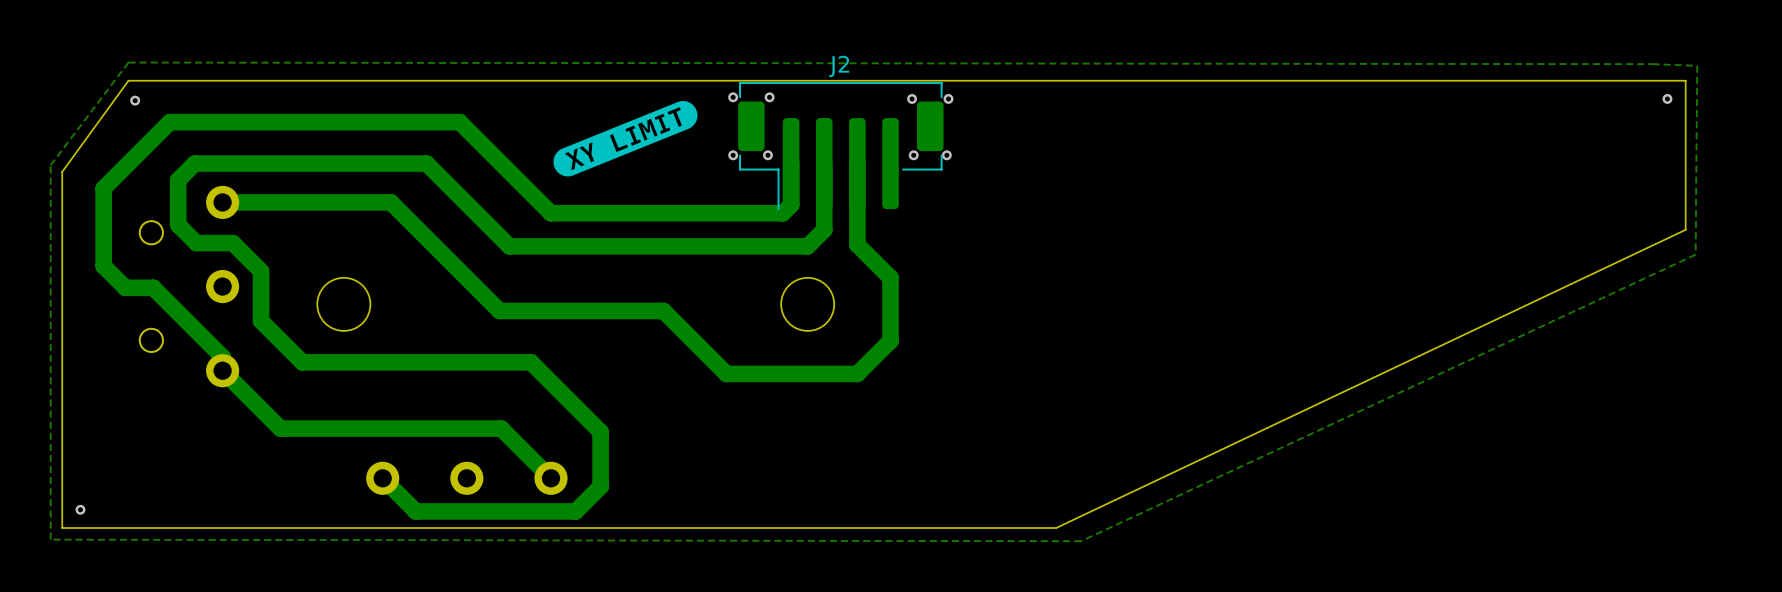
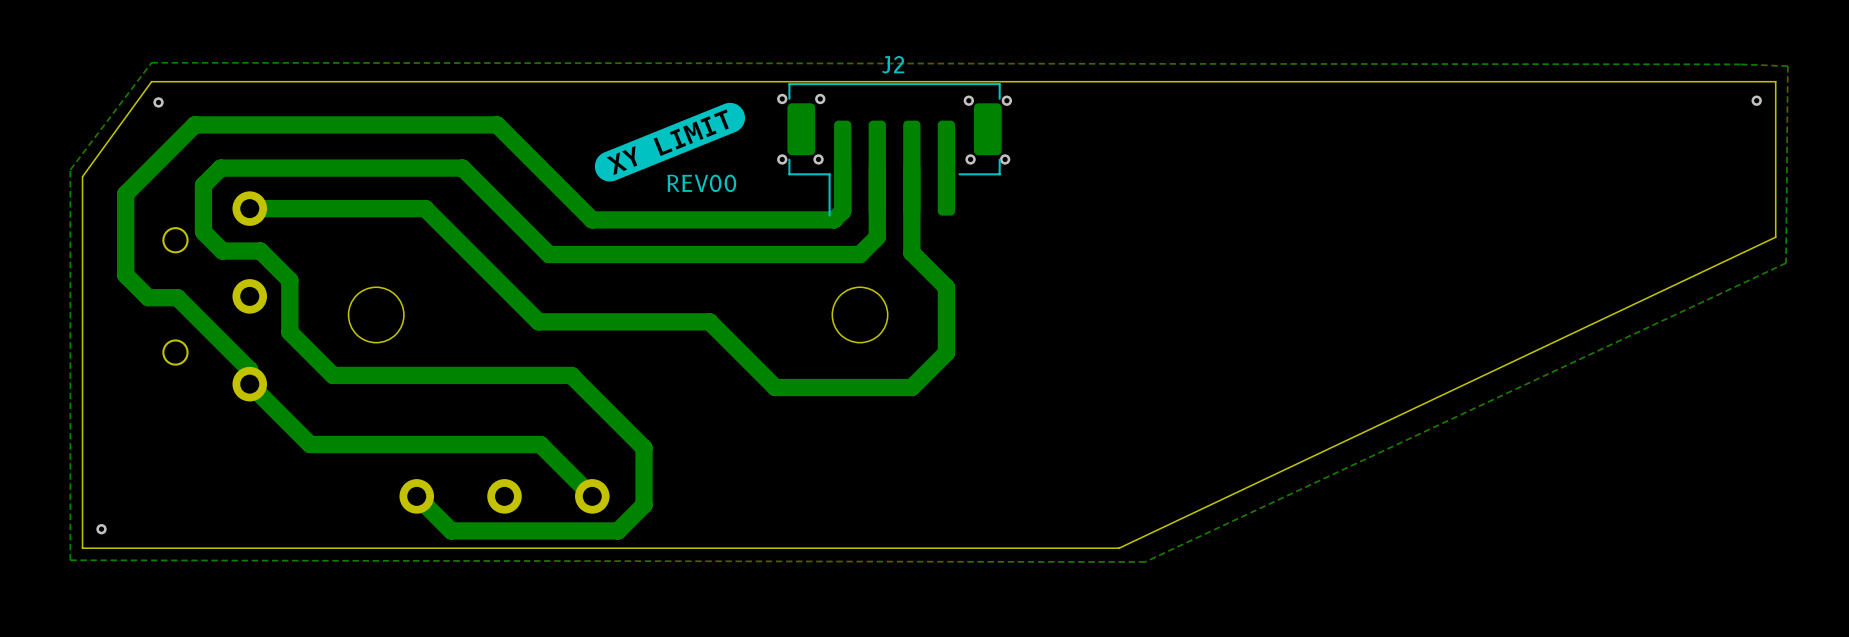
text: none -> REV00 (701, 183)

